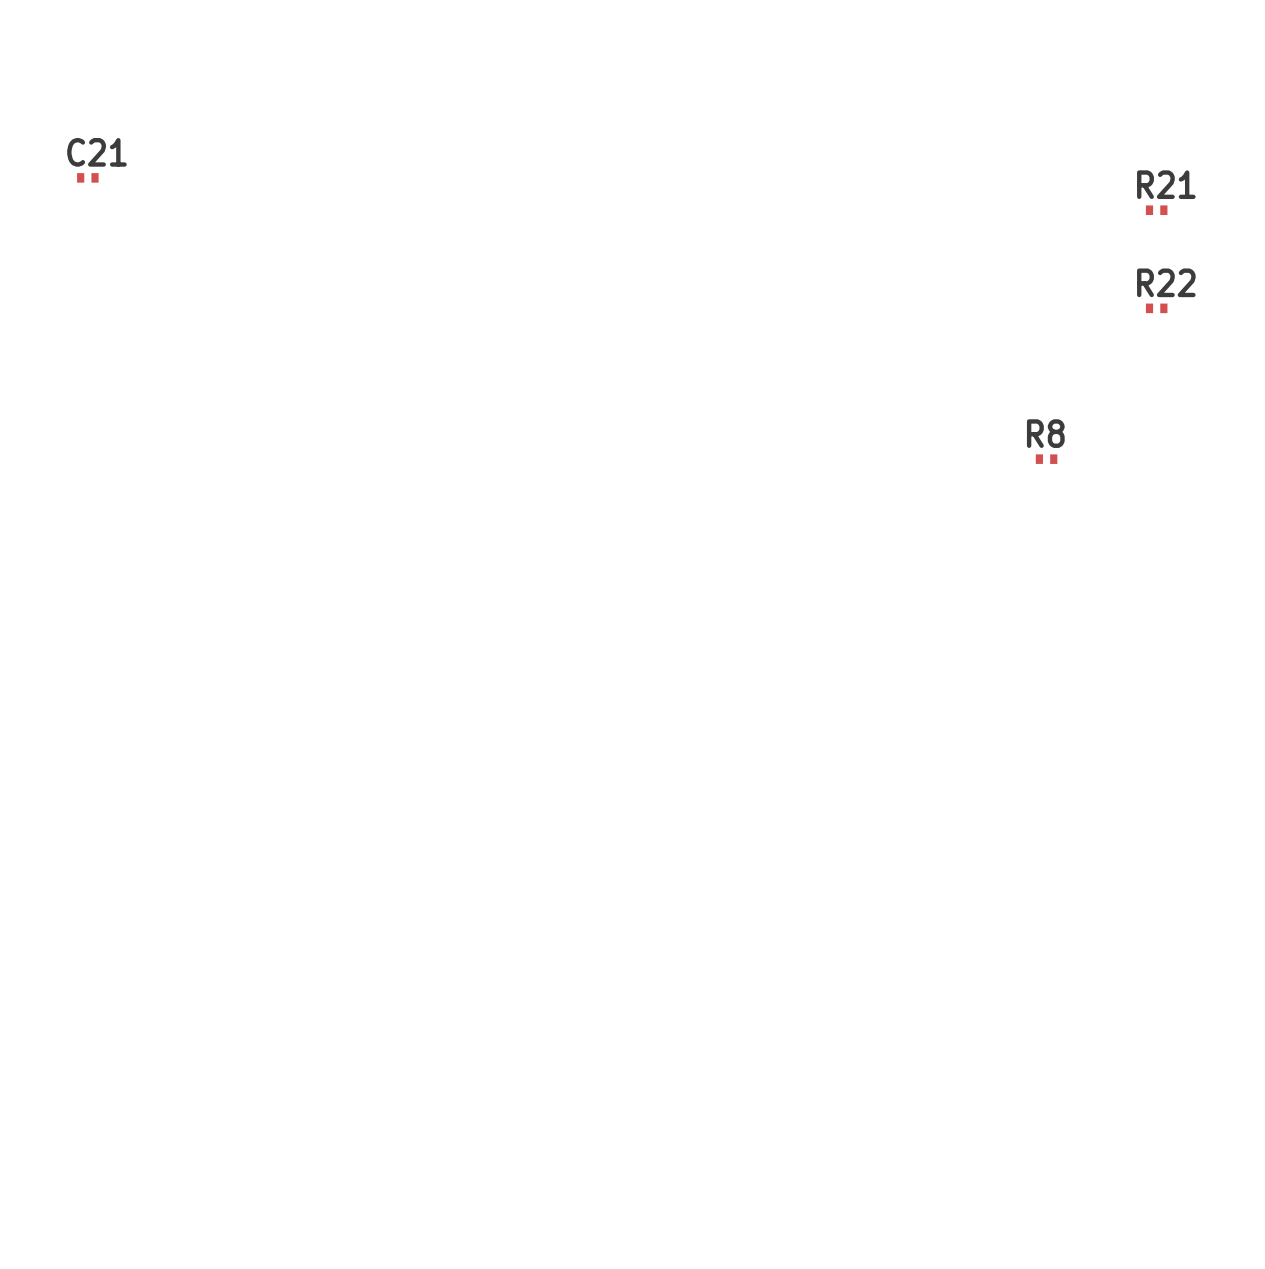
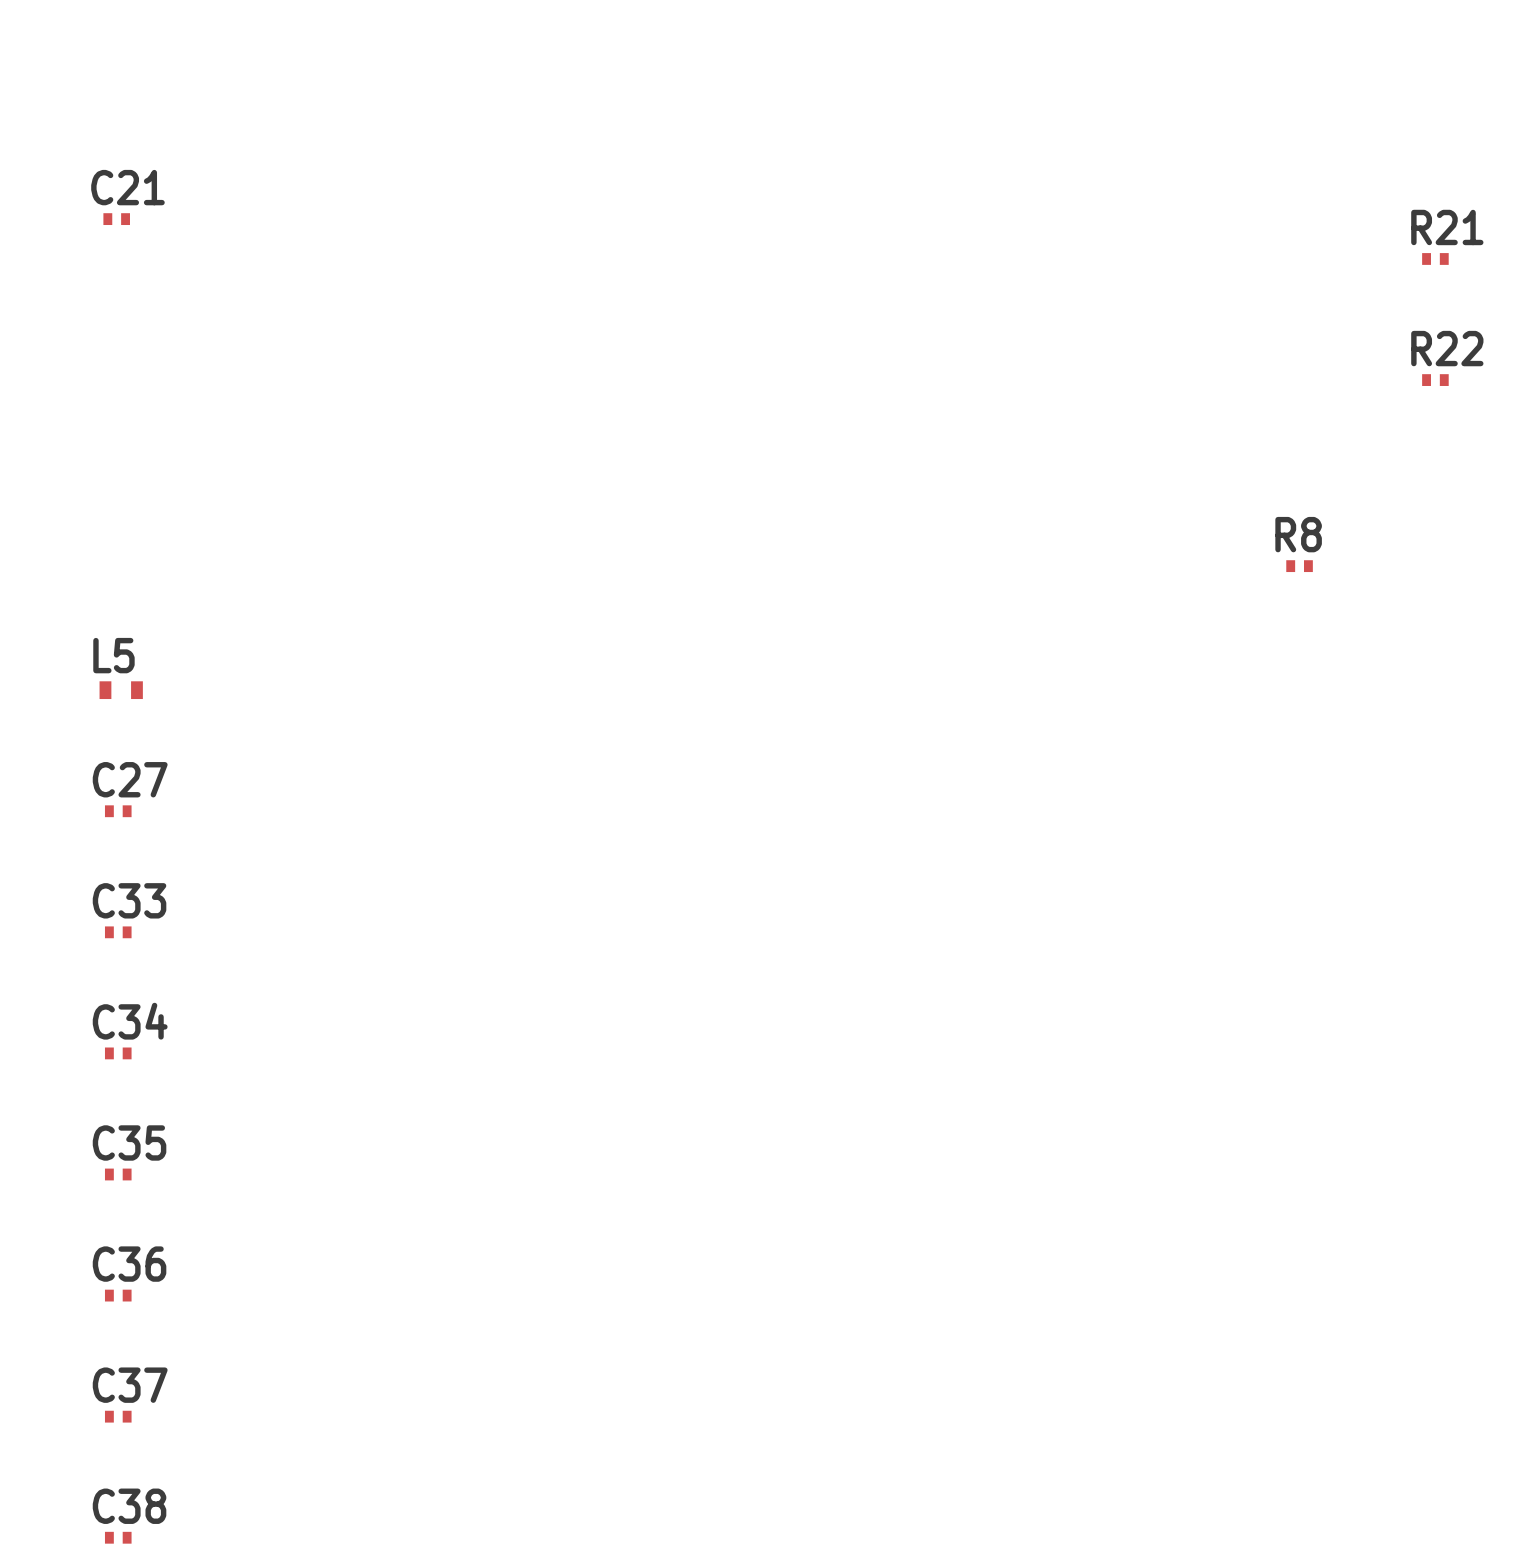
L5: none -> (121, 690)
C27: none -> (118, 811)
C33: none -> (118, 932)
C34: none -> (118, 1053)
C35: none -> (118, 1174)
C36: none -> (118, 1295)
C37: none -> (118, 1416)
C38: none -> (118, 1537)

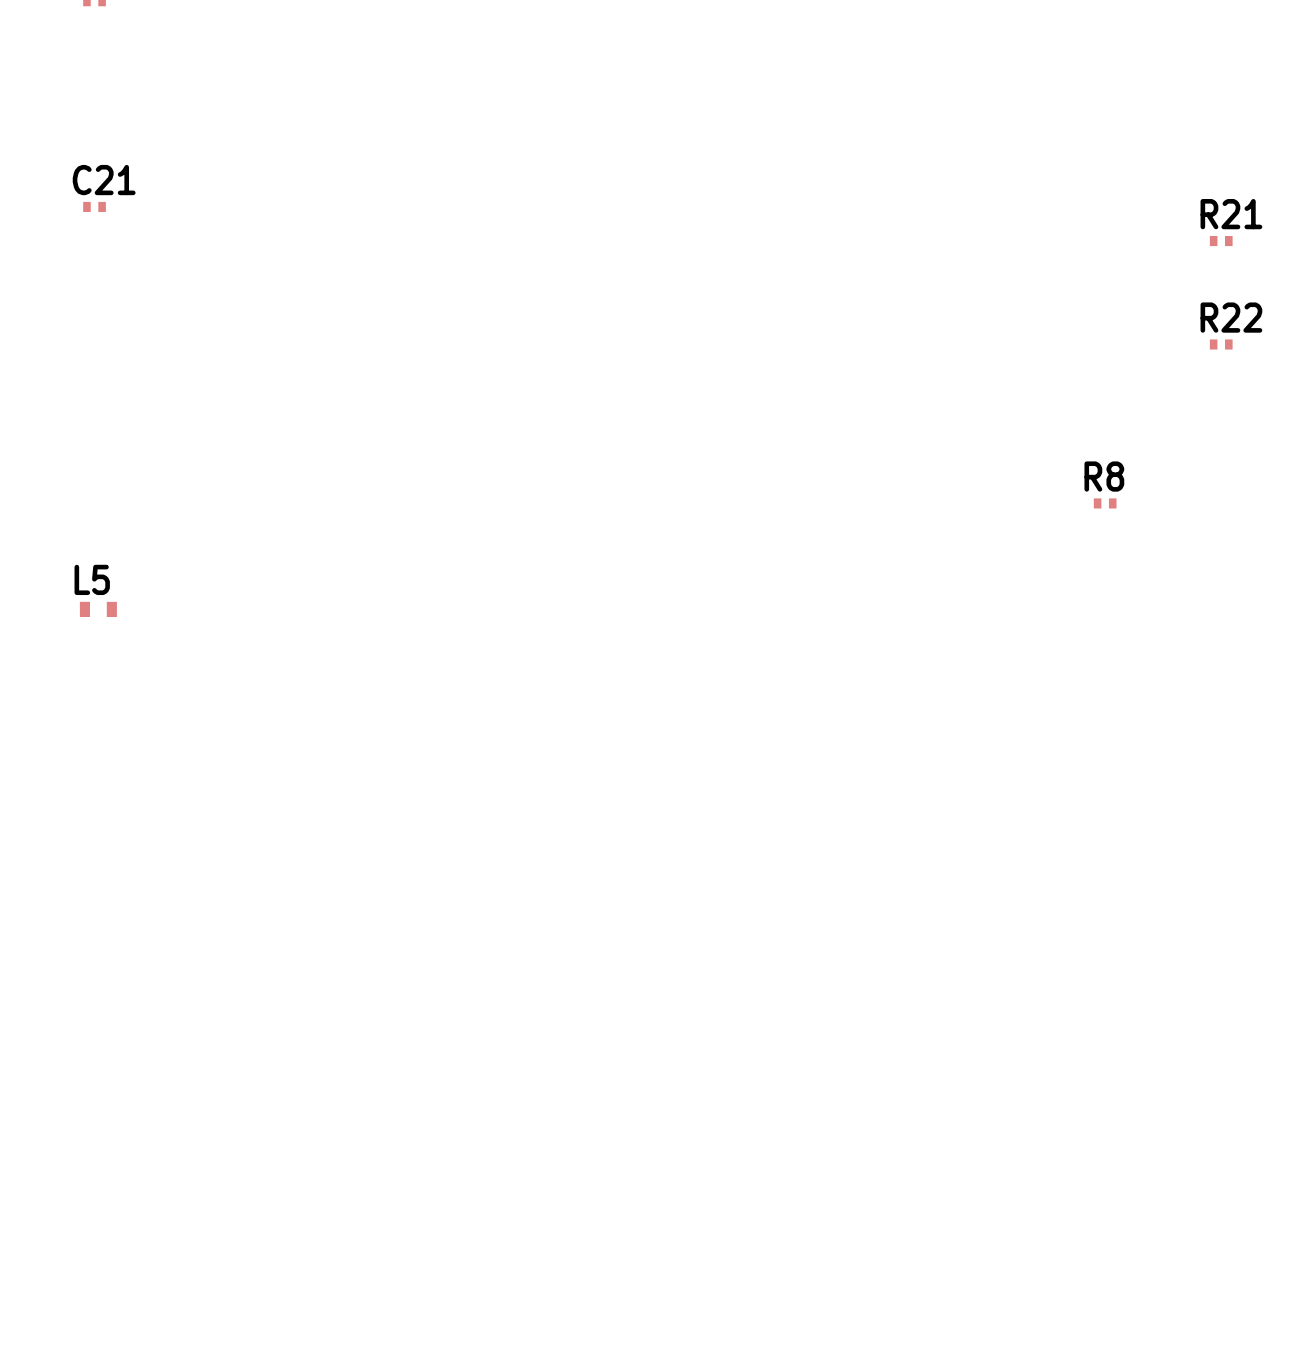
C27: (118, 811) -> none
C33: (118, 932) -> none
C34: (118, 1053) -> none
C35: (118, 1174) -> none
C36: (118, 1295) -> none
C37: (118, 1416) -> none
C38: (118, 1537) -> none

